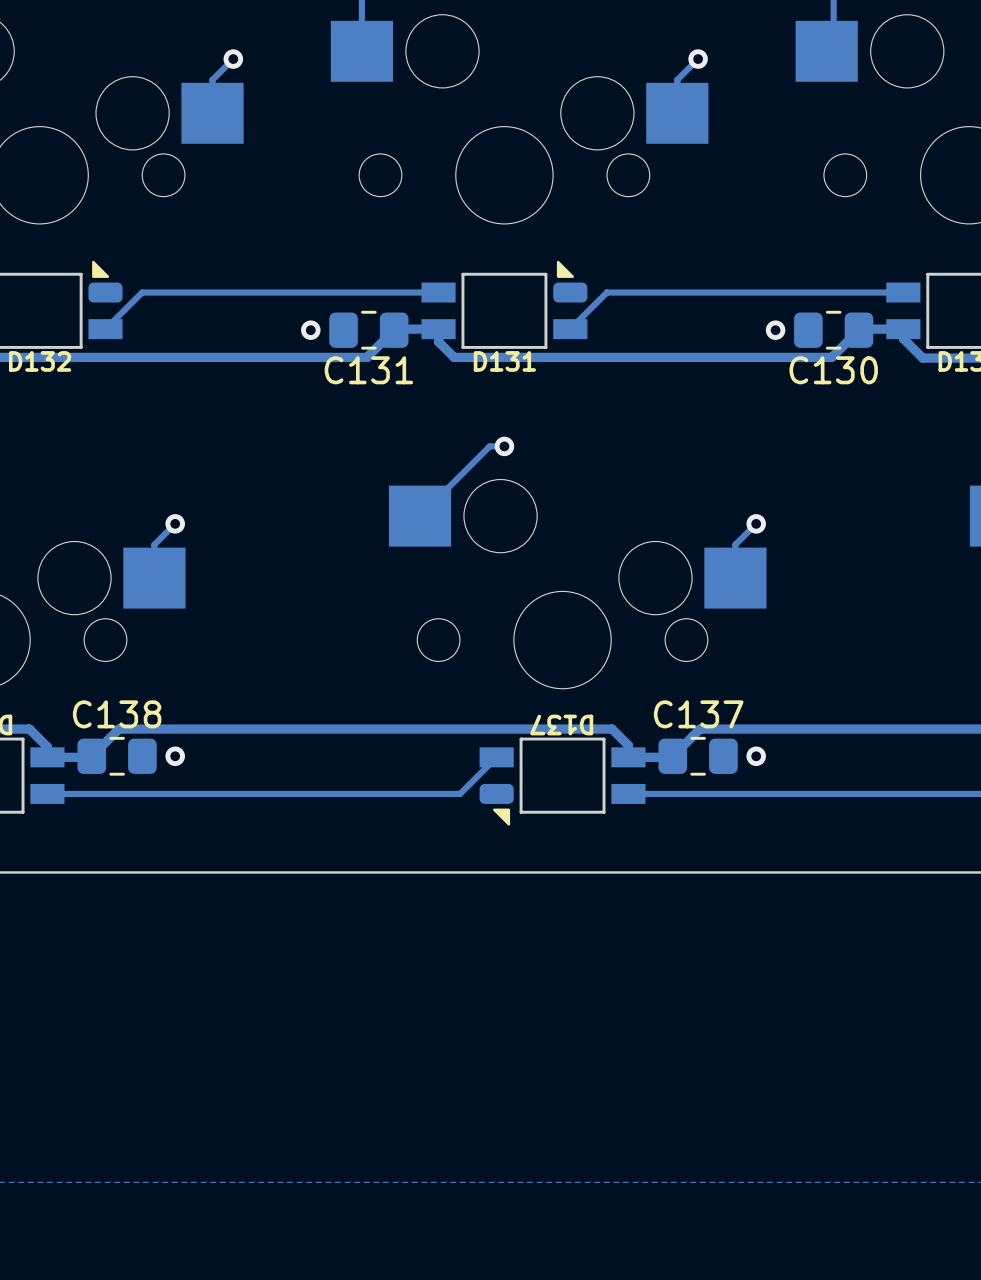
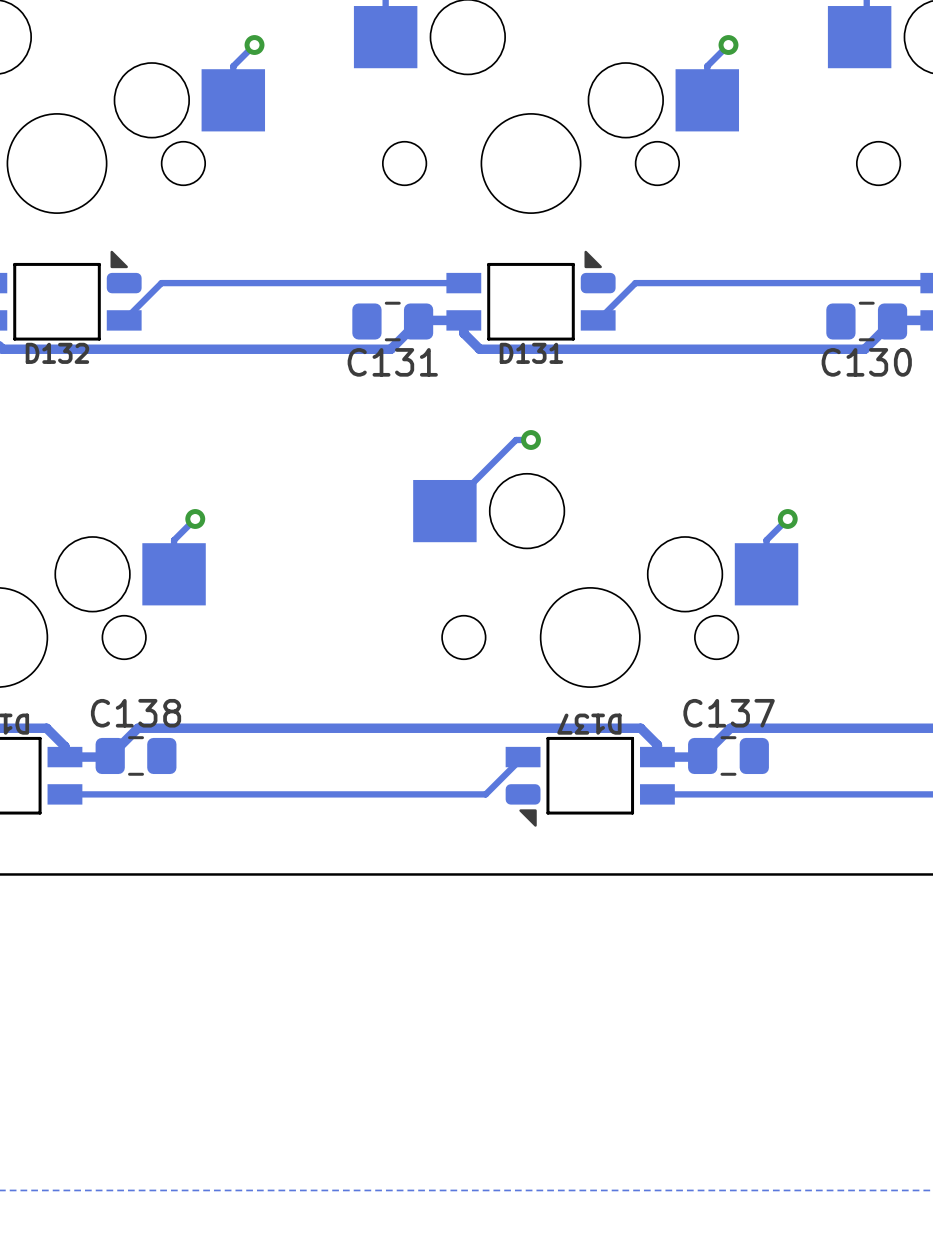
via: (310, 330) -> none
via: (775, 330) -> none
via: (175, 756) -> none
via: (756, 756) -> none

